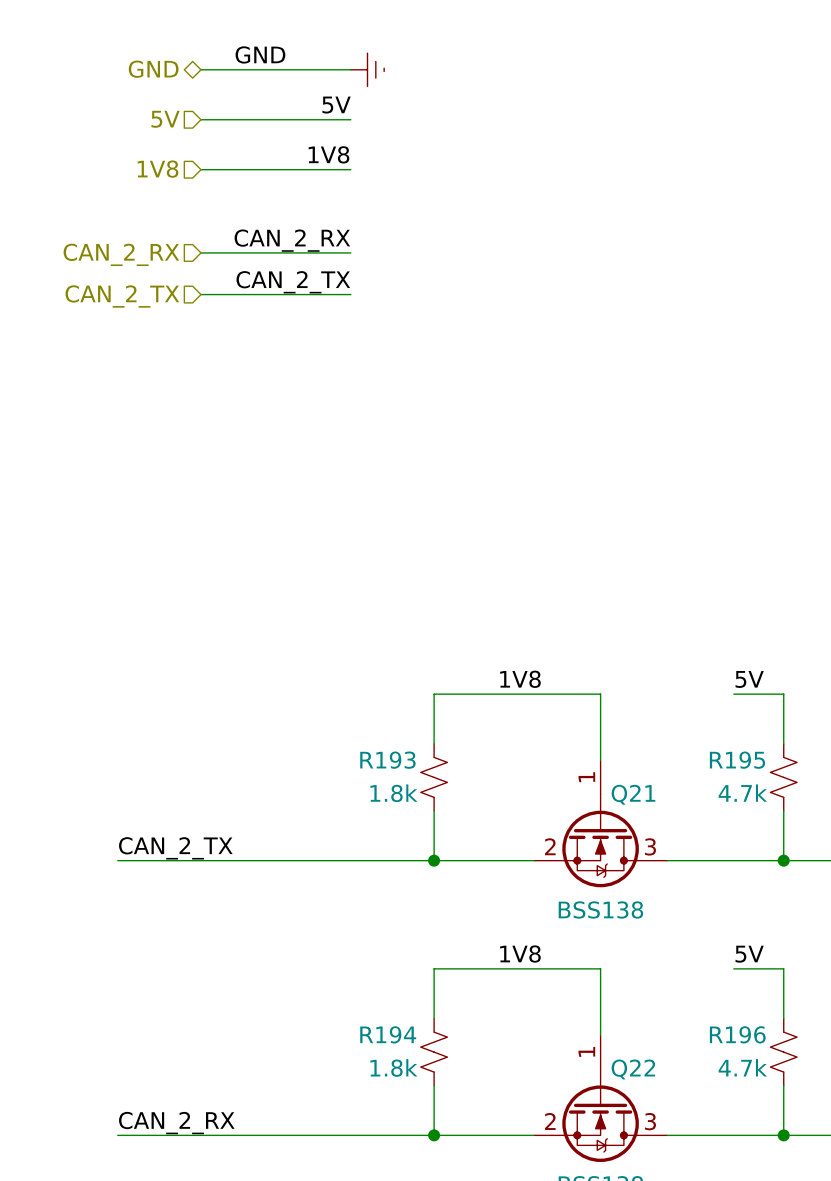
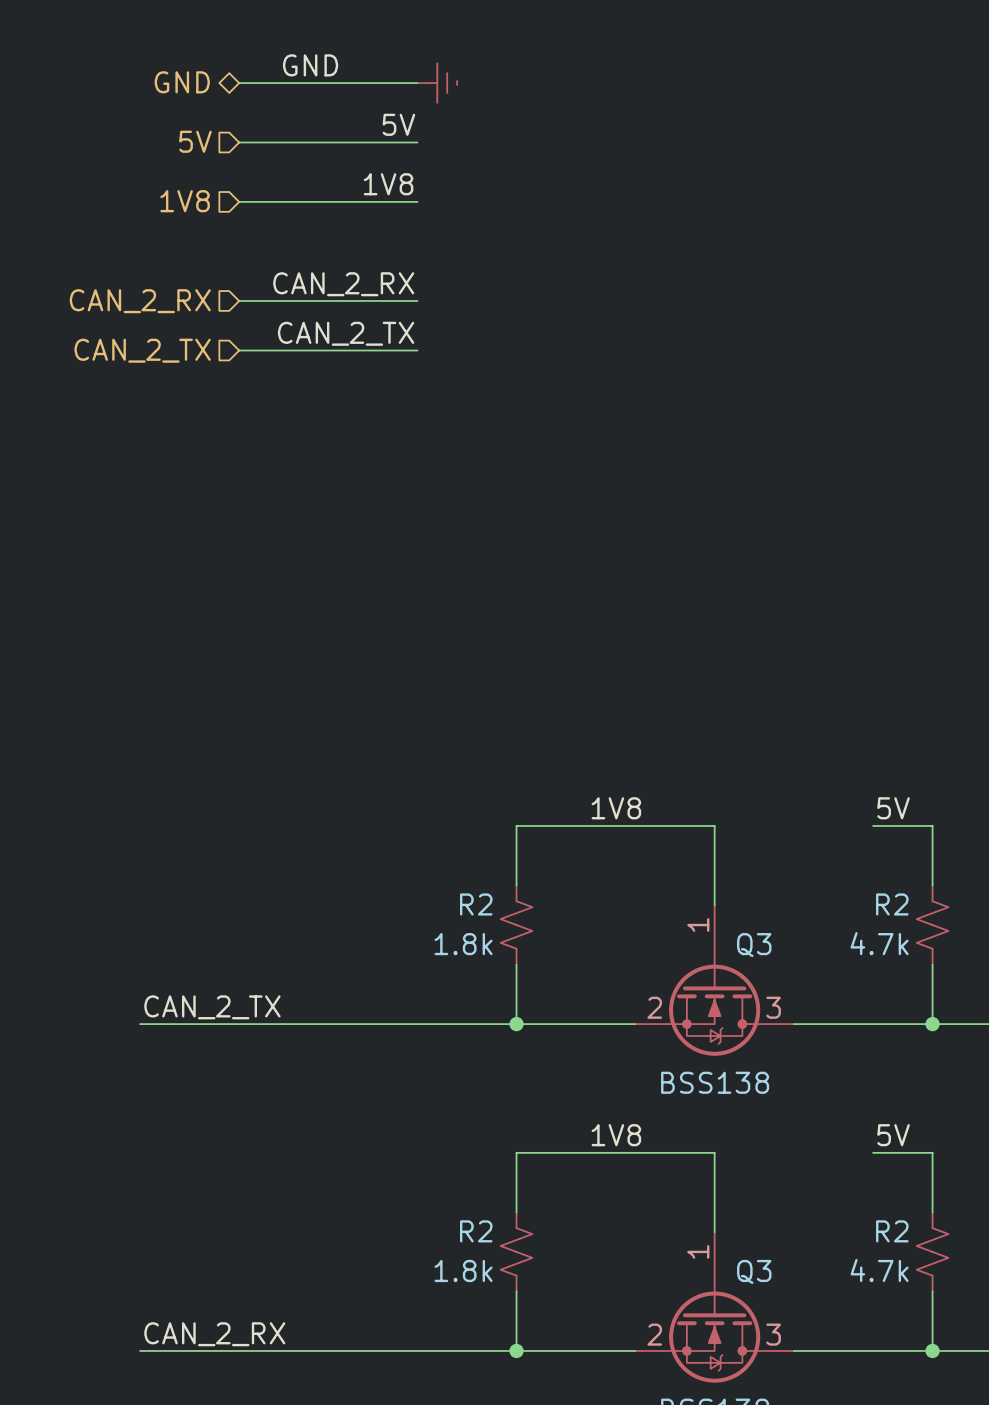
R193 name: R193 (387, 760) -> R2 (476, 904)
R195 name: R195 (737, 760) -> R2 (892, 904)
Q21 name: Q21 (633, 794) -> Q3 (754, 945)
R194 name: R194 (388, 1034) -> R2 (476, 1231)
R196 name: R196 (737, 1034) -> R2 (892, 1231)
Q22 name: Q22 (633, 1069) -> Q3 (754, 1271)

